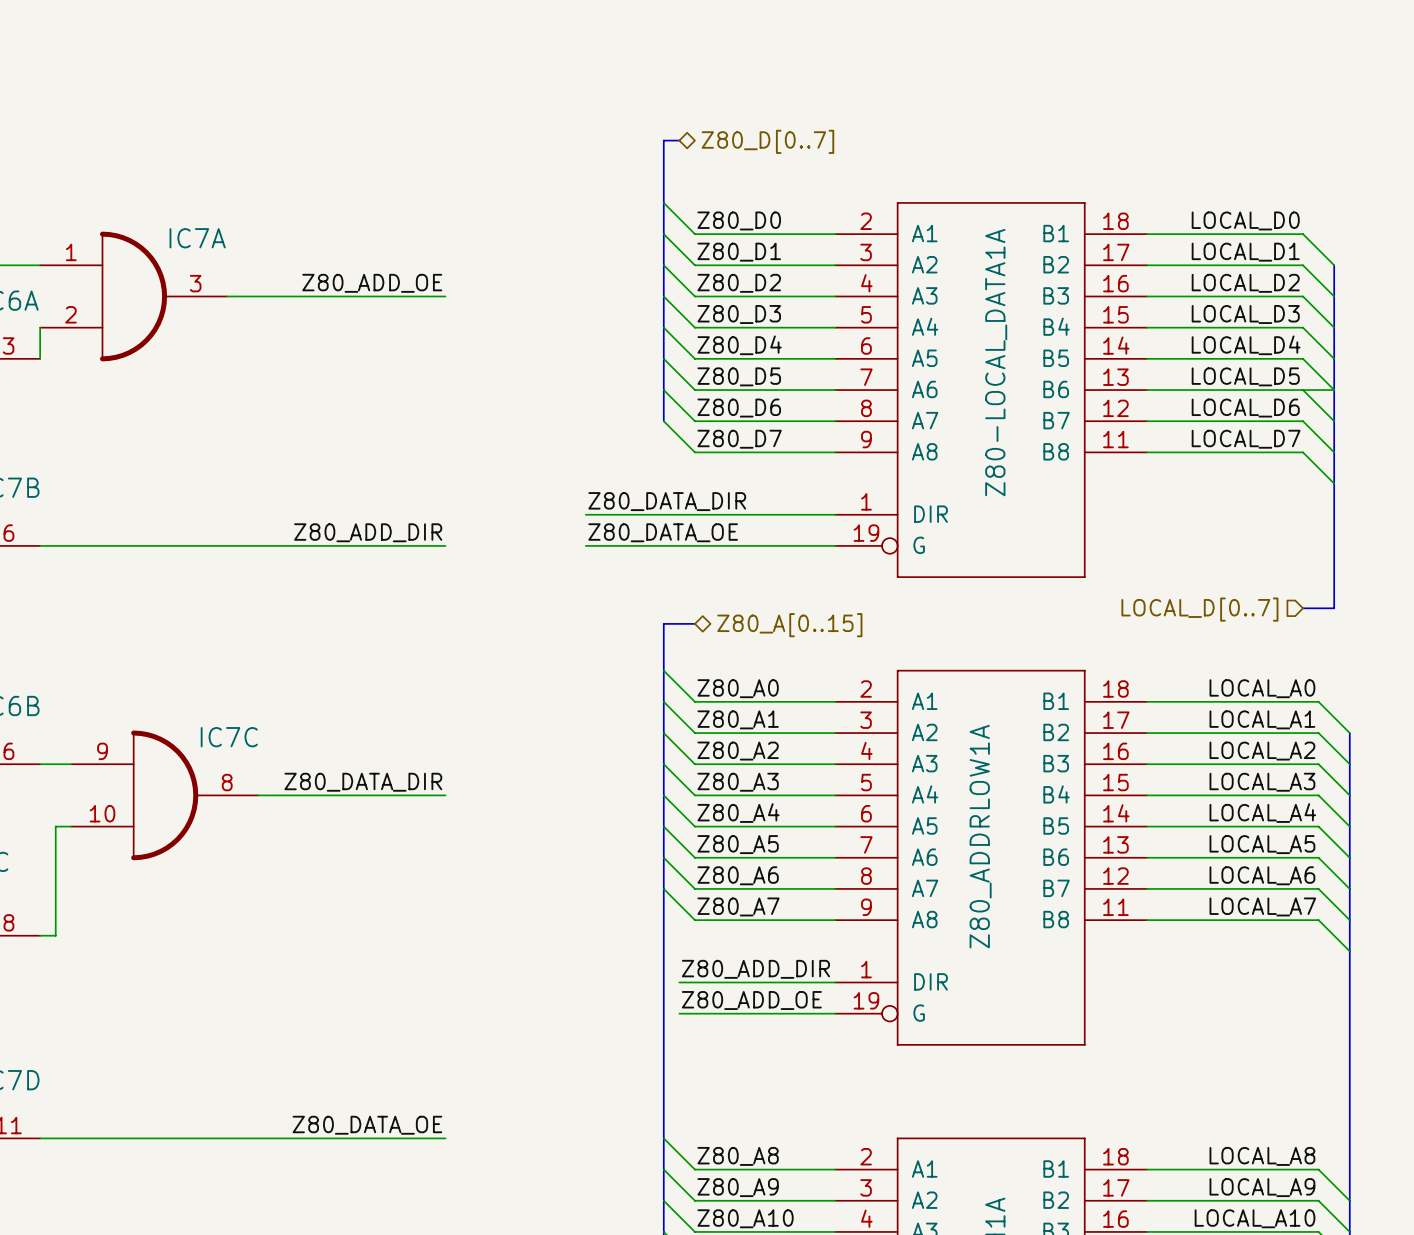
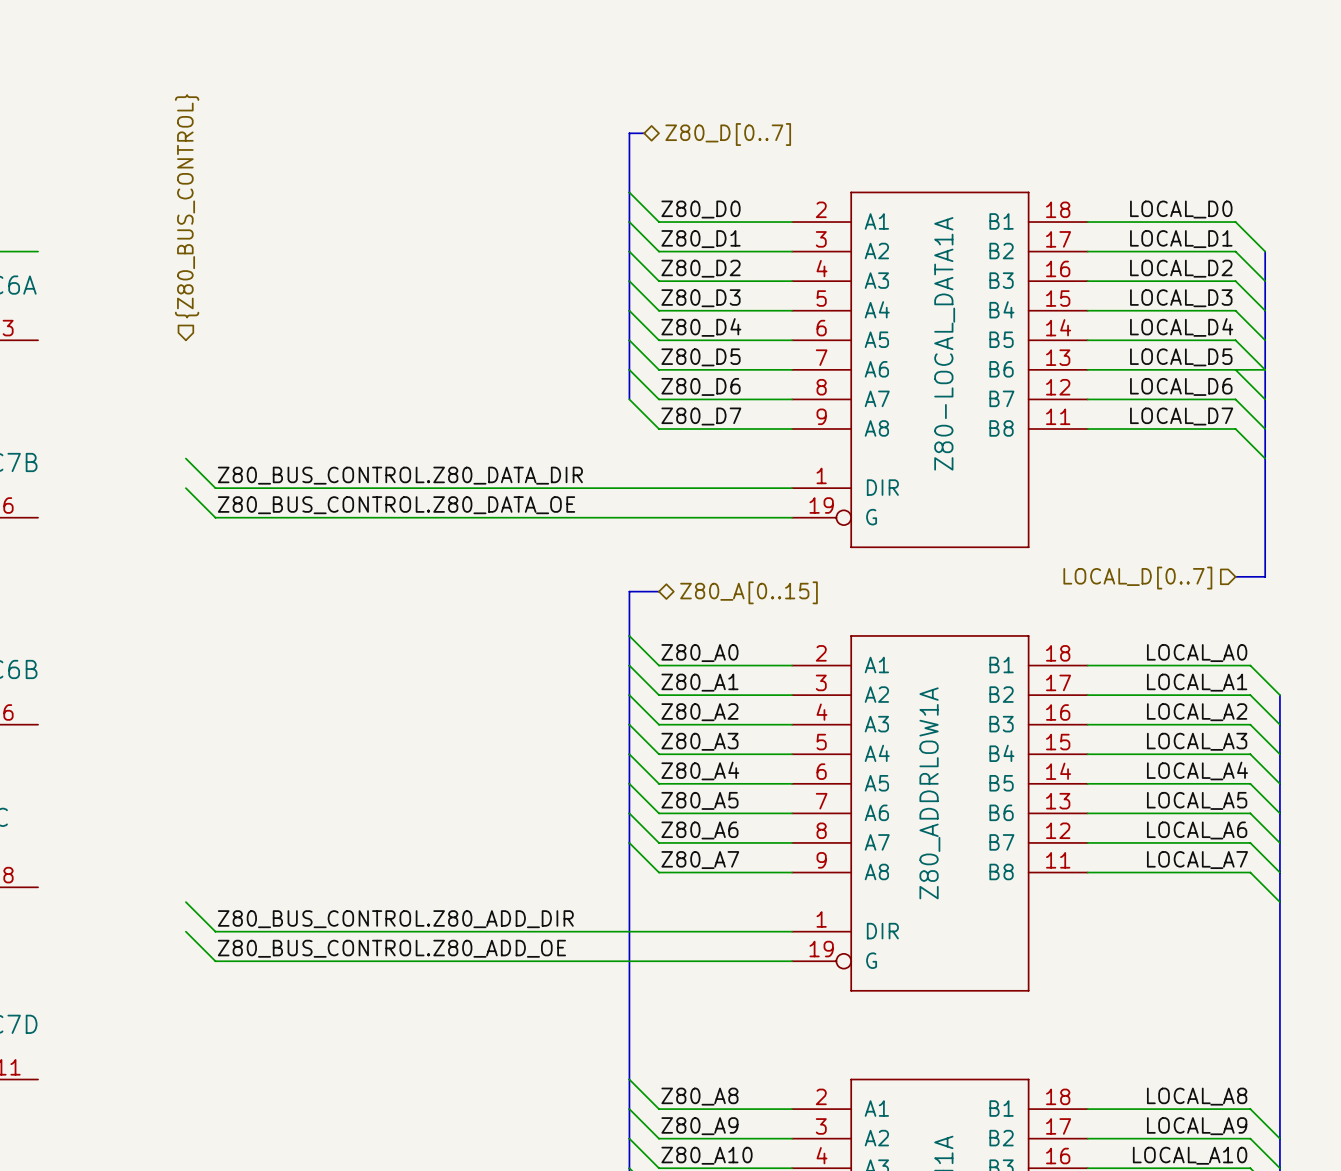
hierarchical label: none -> {Z80_BUS_CONTROL} (187, 206)
label: Z80_ADD_OE (372, 283) -> none
IC7A: (133, 296) -> none
wire: (227, 296) (445, 296) -> none
wire: (40, 327) (40, 358) -> none
wire: none -> (185, 458) (215, 488) (555, 488)
label: none -> Z80_BUS_CONTROL.Z80_DATA_DIR (400, 475)
label: Z80_DATA_DIR (667, 501) -> none
label: Z80_ADD_DIR (368, 532) -> none
label: none -> Z80_BUS_CONTROL.Z80_DATA_OE (396, 505)
label: Z80_DATA_OE (663, 532) -> none
wire: (40, 545) (227, 545) -> (185, 488) (215, 517)
wire: none -> (422, 517) (555, 517)
wire: (40, 764) (71, 764) -> none
label: Z80_DATA_DIR (363, 782) -> none
IC7C: (164, 795) -> none
wire: (258, 795) (445, 795) -> none
wire: (71, 826) (55, 826) (55, 935) (40, 935) -> none
wire: none -> (185, 902) (215, 931) (644, 931)
label: none -> Z80_BUS_CONTROL.Z80_ADD_DIR (395, 919)
label: Z80_ADD_DIR (755, 969) -> none
wire: none -> (185, 931) (215, 961) (644, 961)
label: none -> Z80_BUS_CONTROL.Z80_ADD_OE (391, 948)
label: Z80_ADD_OE (751, 1000) -> none
label: Z80_DATA_OE (367, 1125) -> none
wire: (40, 1138) (445, 1138) -> none

